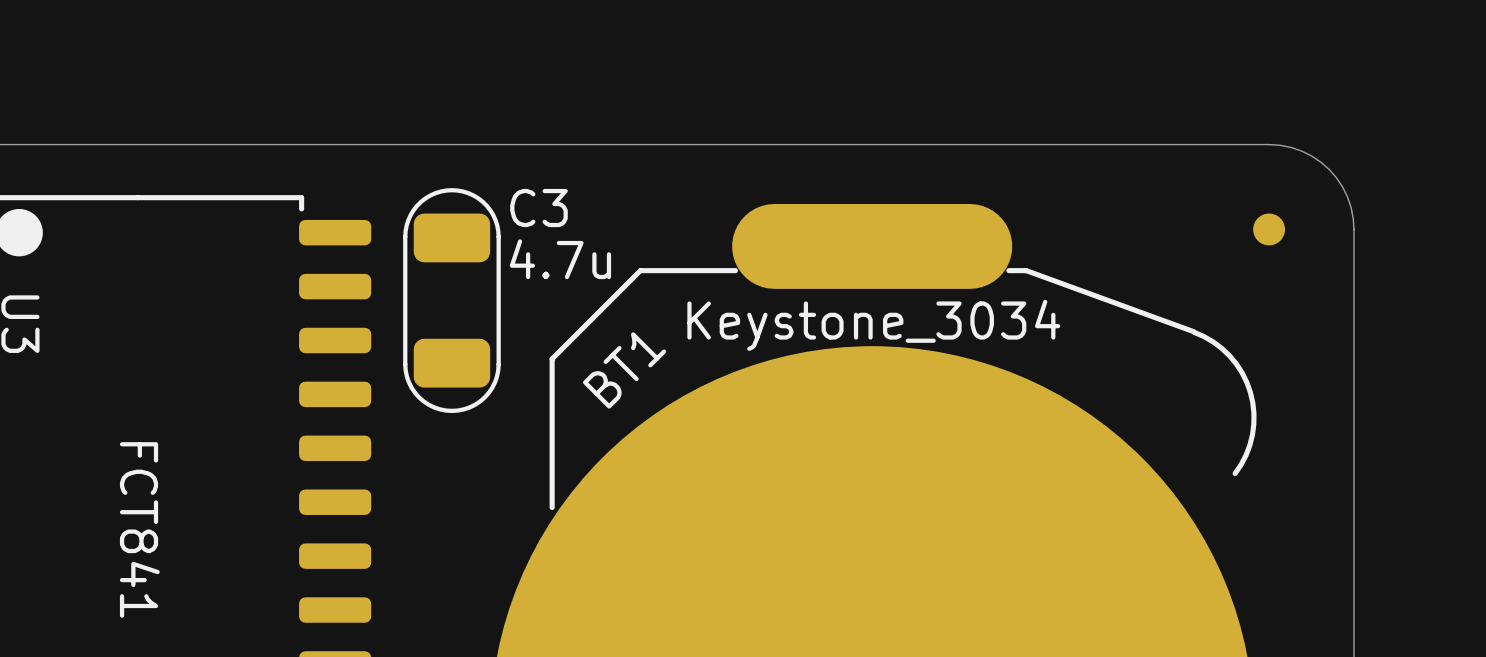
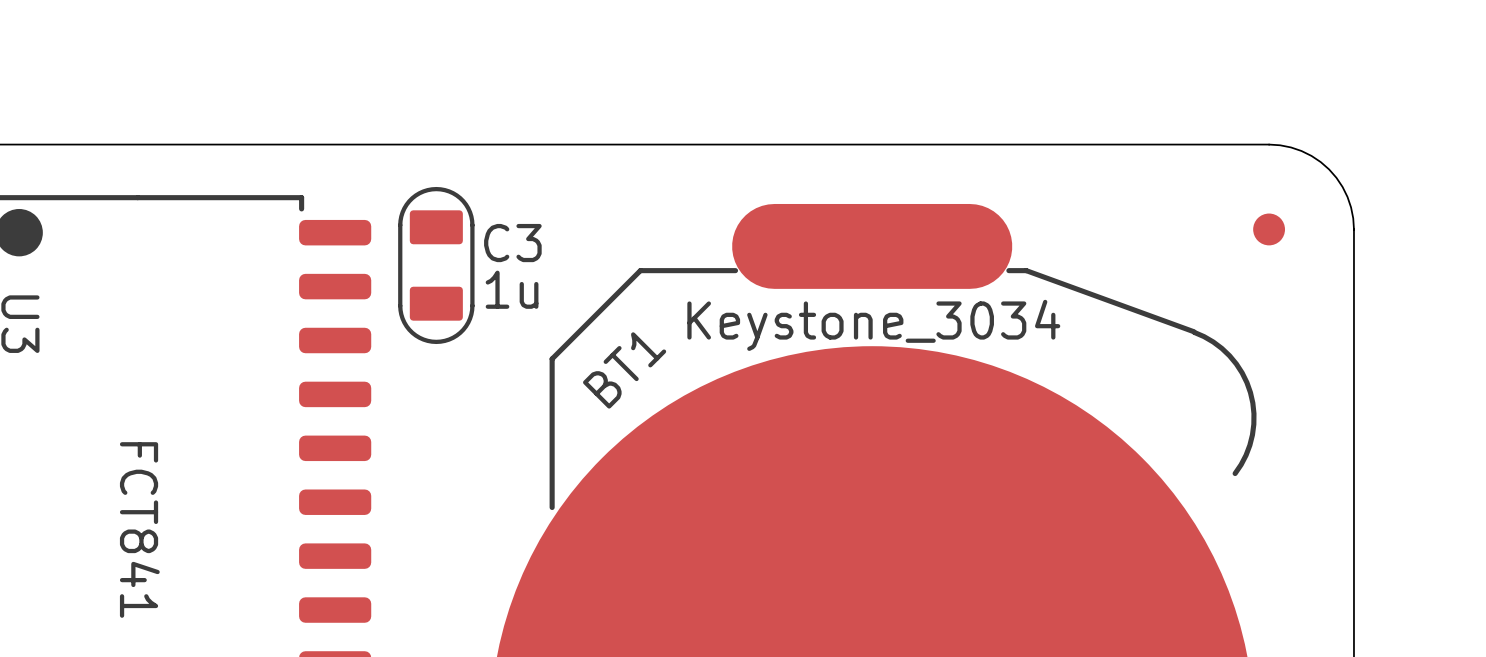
C3 footprint: [403, 188, 501, 414] -> [398, 186, 475, 345]
C3 value: 4.7u (560, 259) -> 1u (512, 289)

